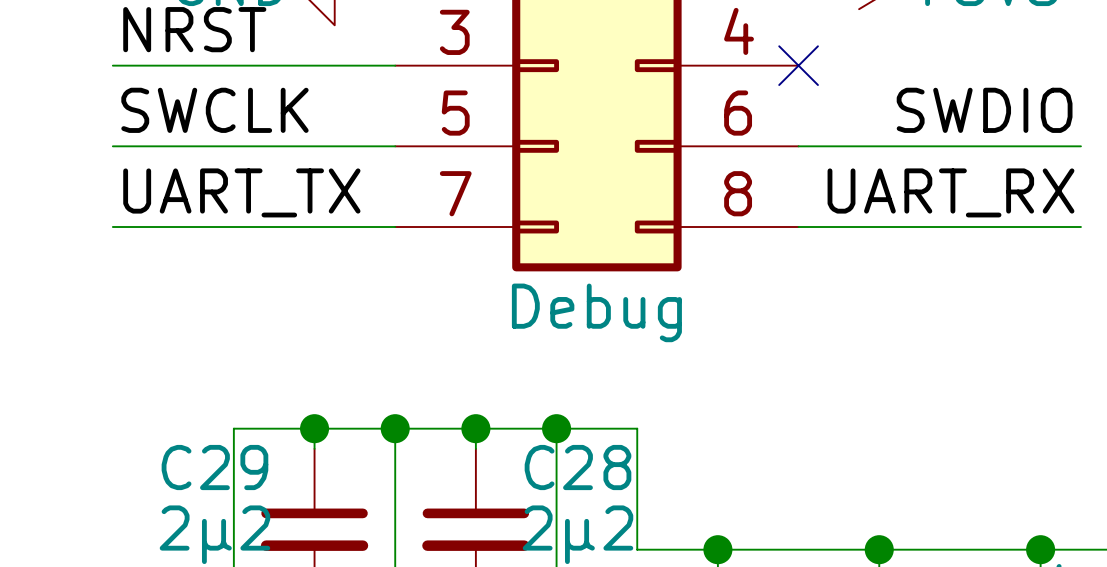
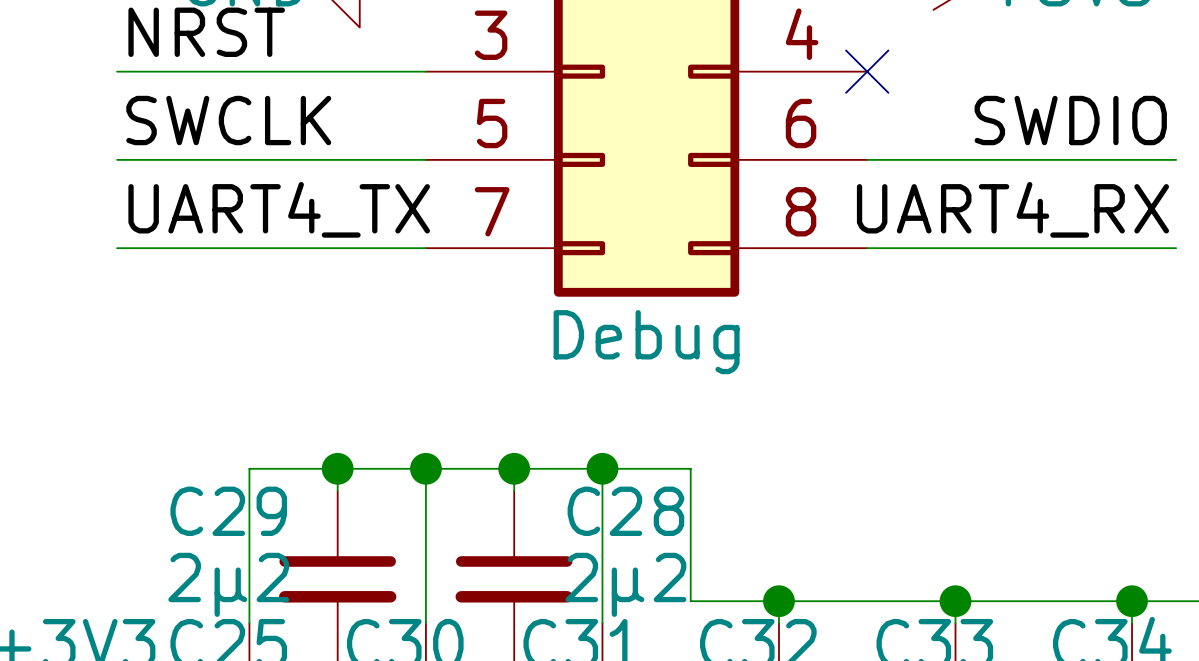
label: UART_TX (241, 192) -> UART4_TX (279, 209)
label: UART_RX (950, 192) -> UART4_RX (1012, 209)

